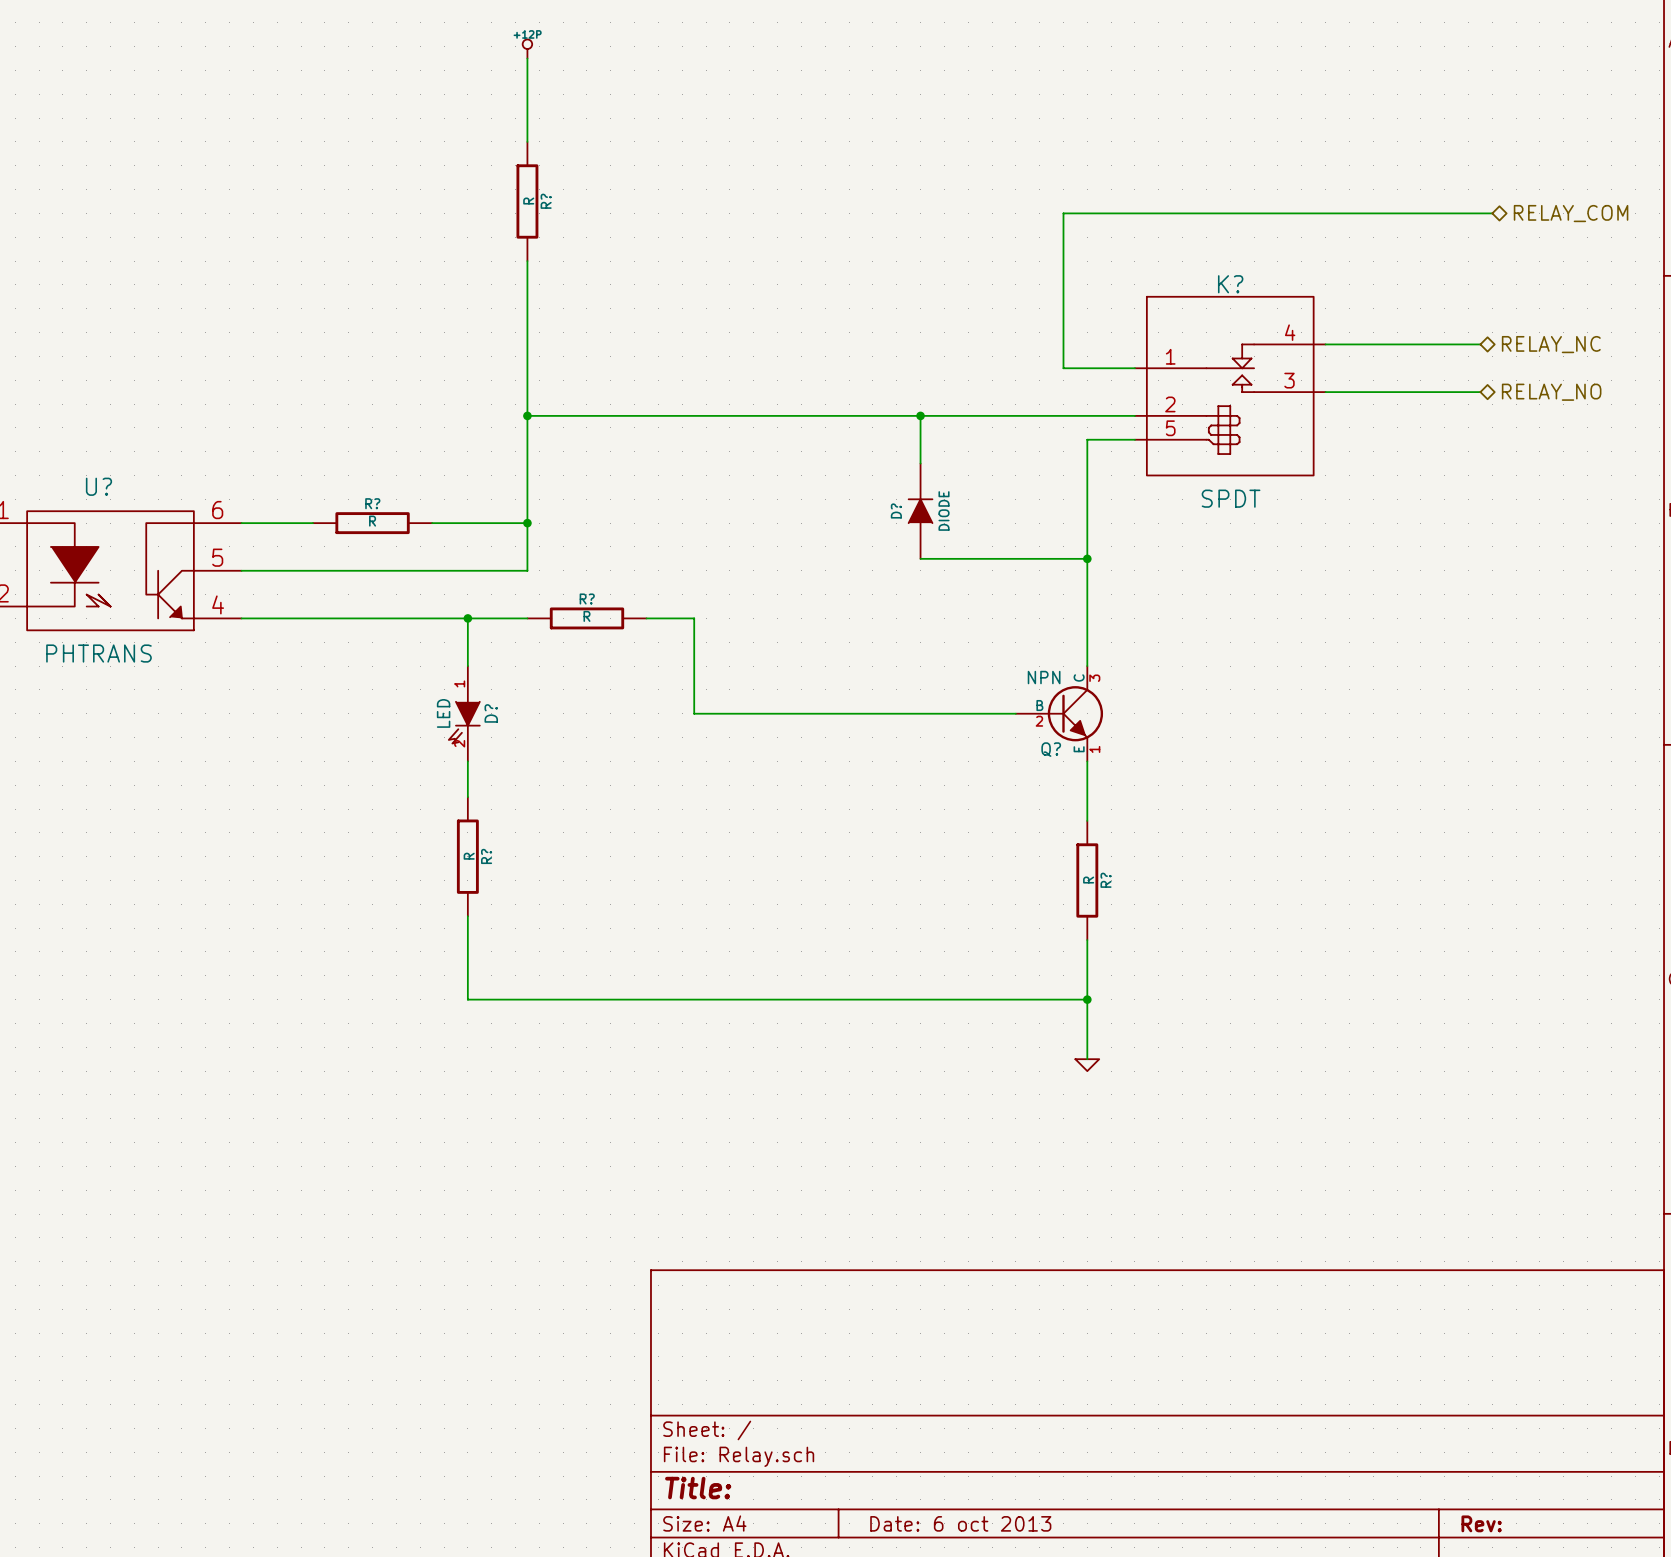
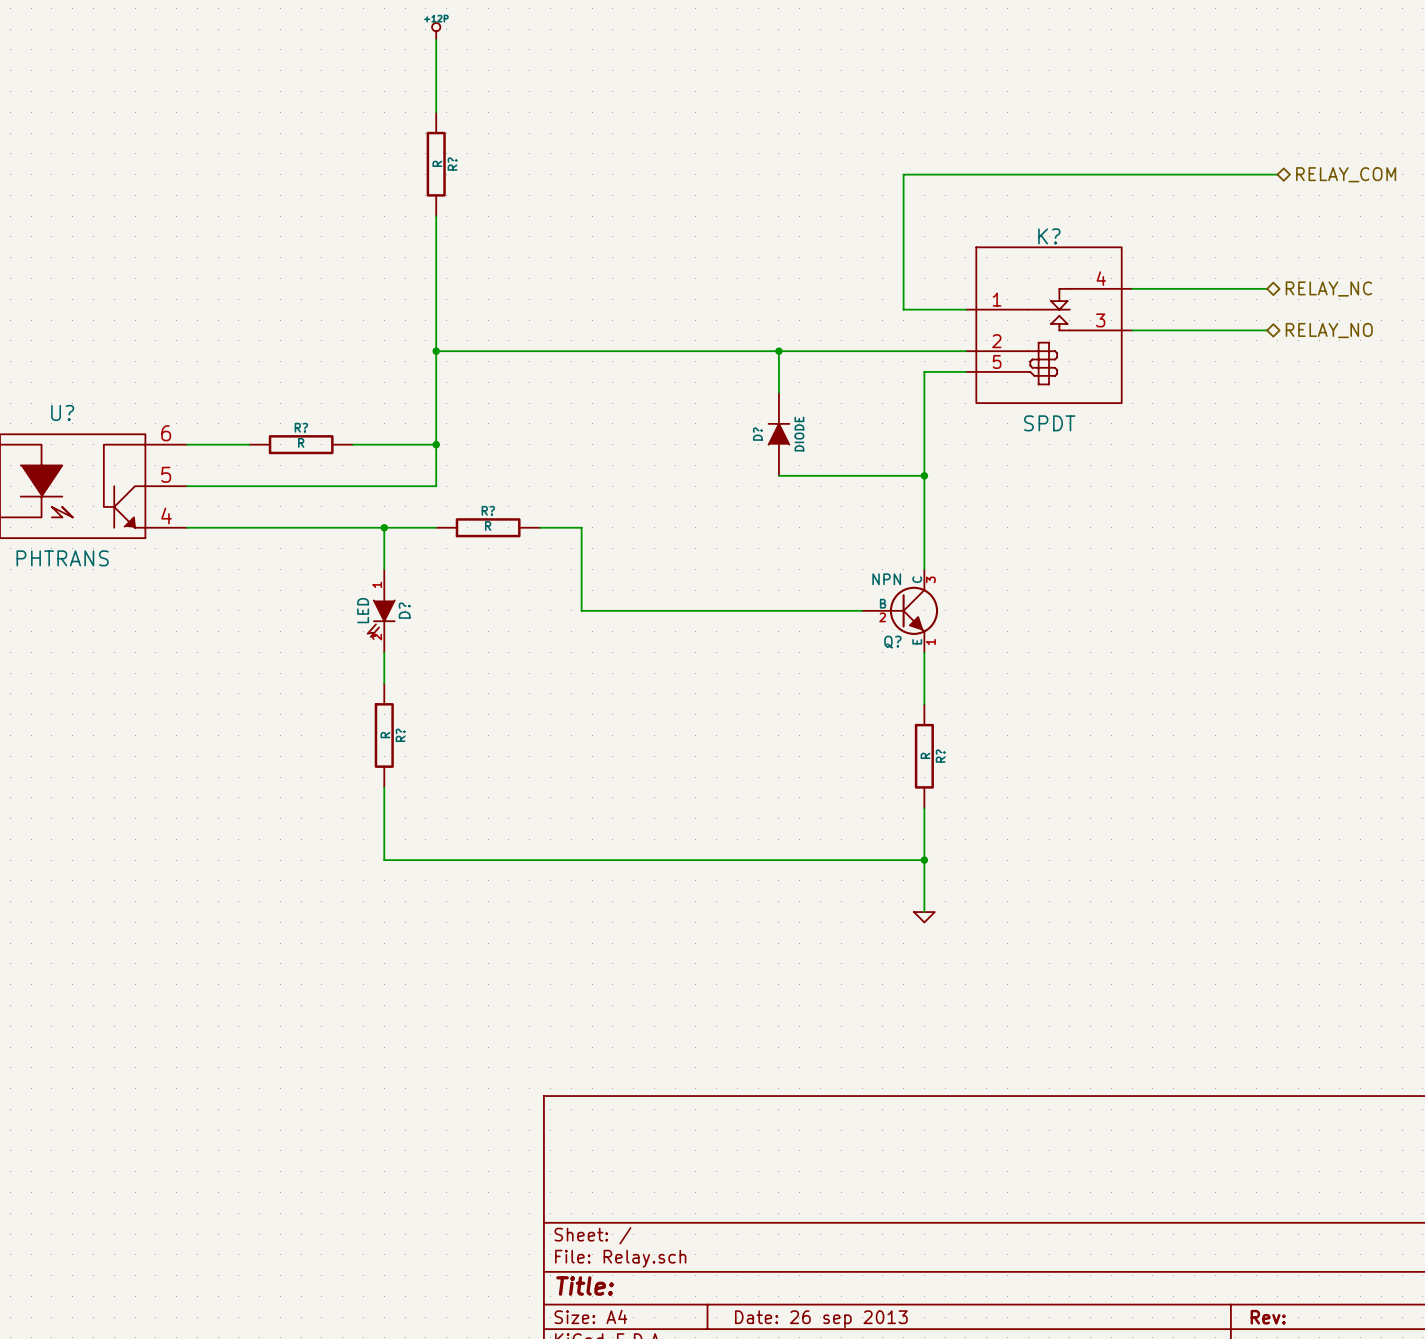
title block: Date: 6 oct 2013 (960, 1523) -> Date: 26 sep 2013 (821, 1319)

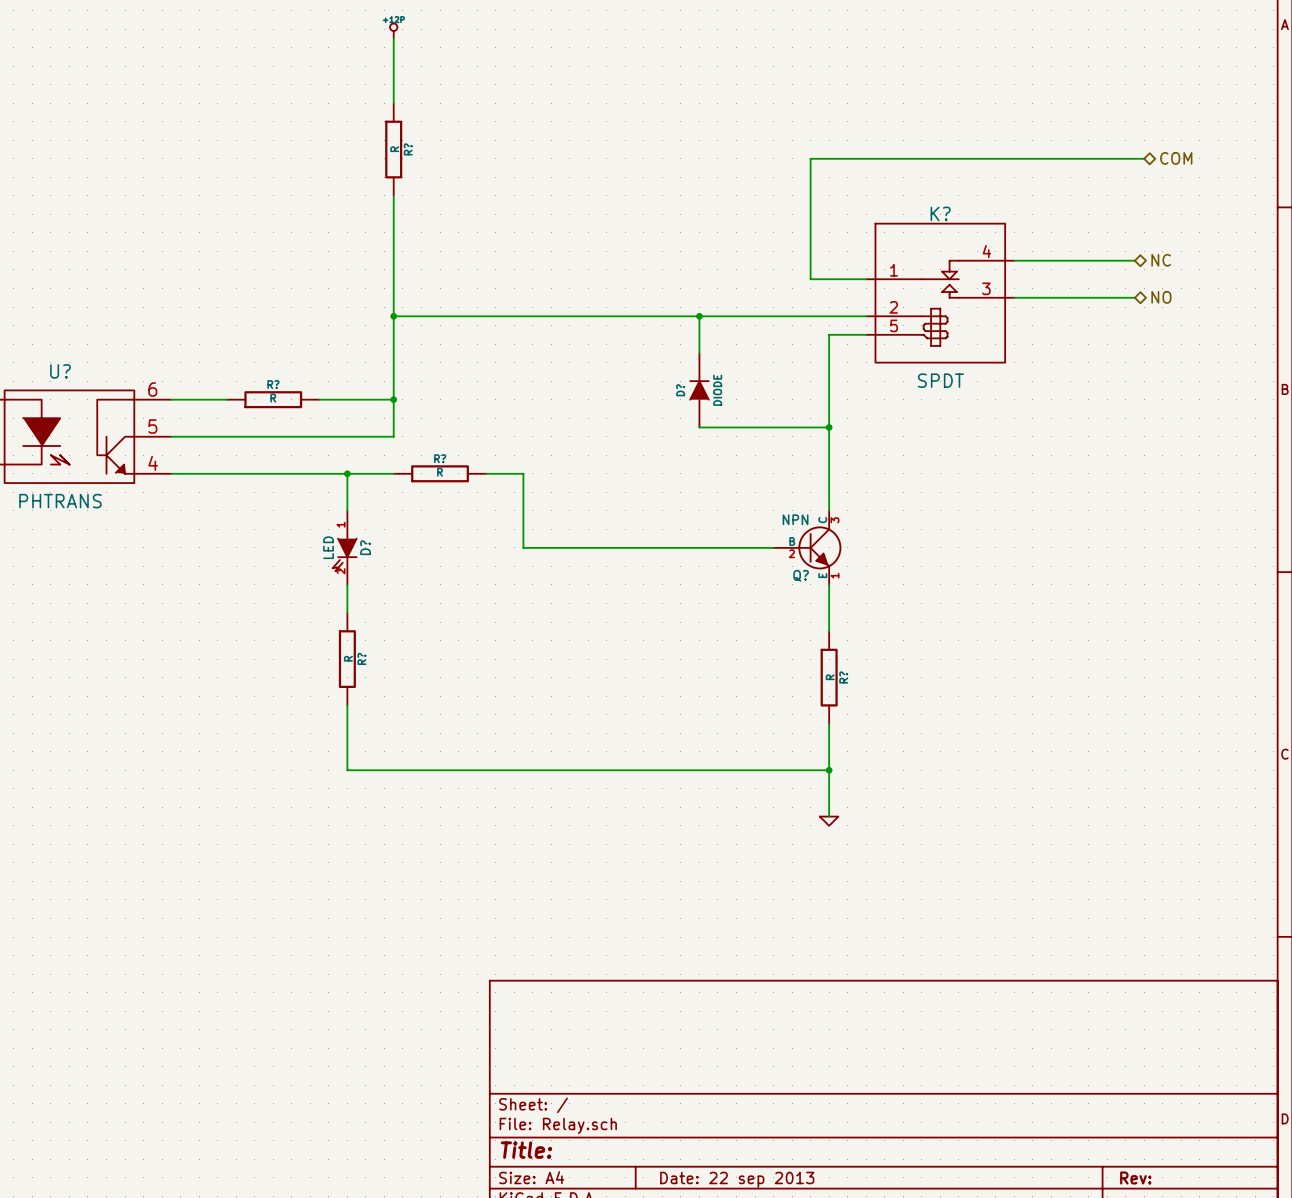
hierarchical label: RELAY_COM (1346, 174) -> COM (1176, 158)
hierarchical label: RELAY_NC (1328, 288) -> NC (1161, 260)
hierarchical label: RELAY_NO (1329, 330) -> NO (1161, 297)
title block: Date: 26 sep 2013 (821, 1319) -> Date: 22 sep 2013 (737, 1179)

